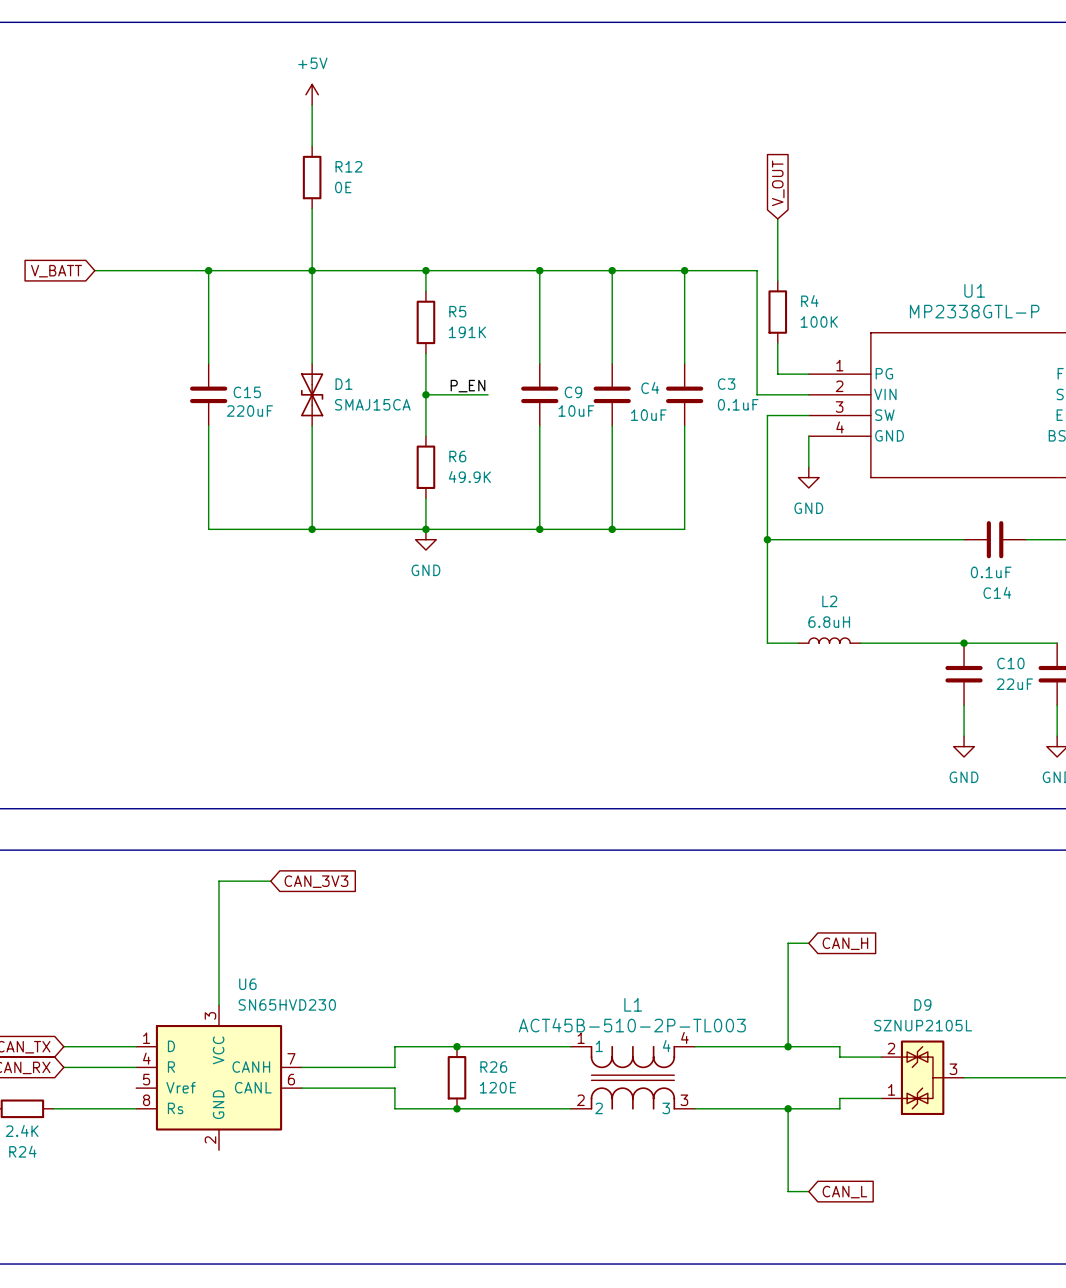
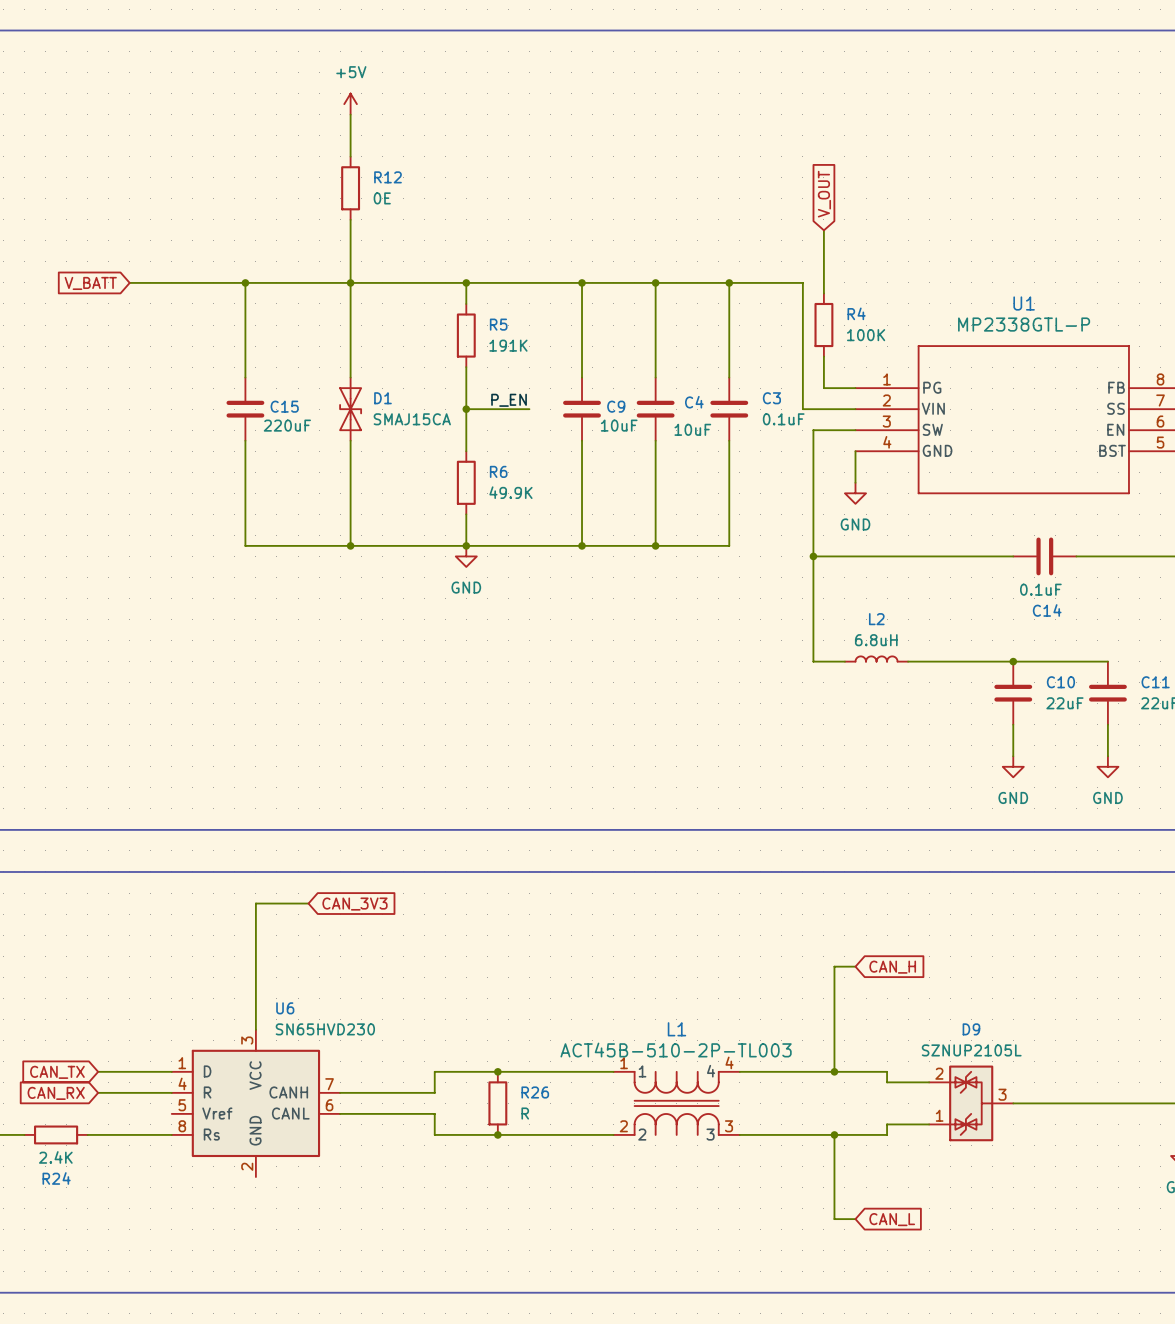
R26 value: 120E (497, 1087) -> R (525, 1113)

